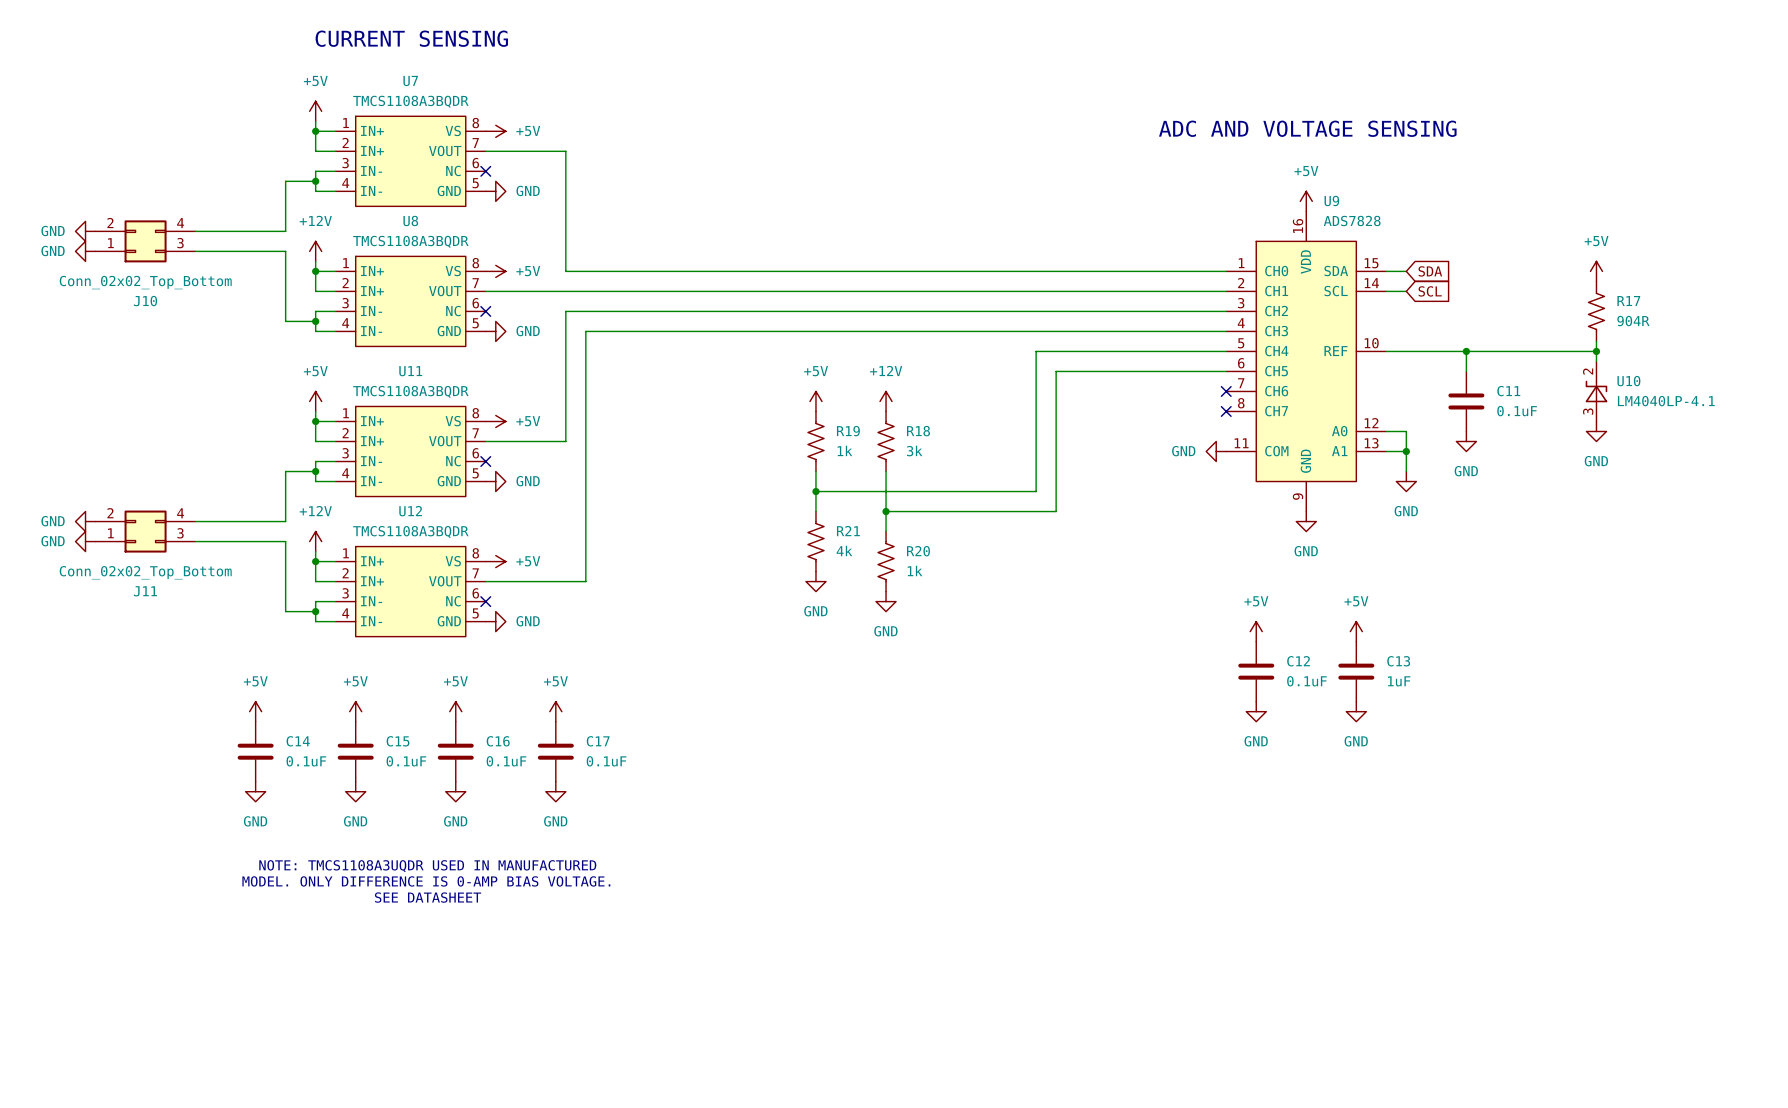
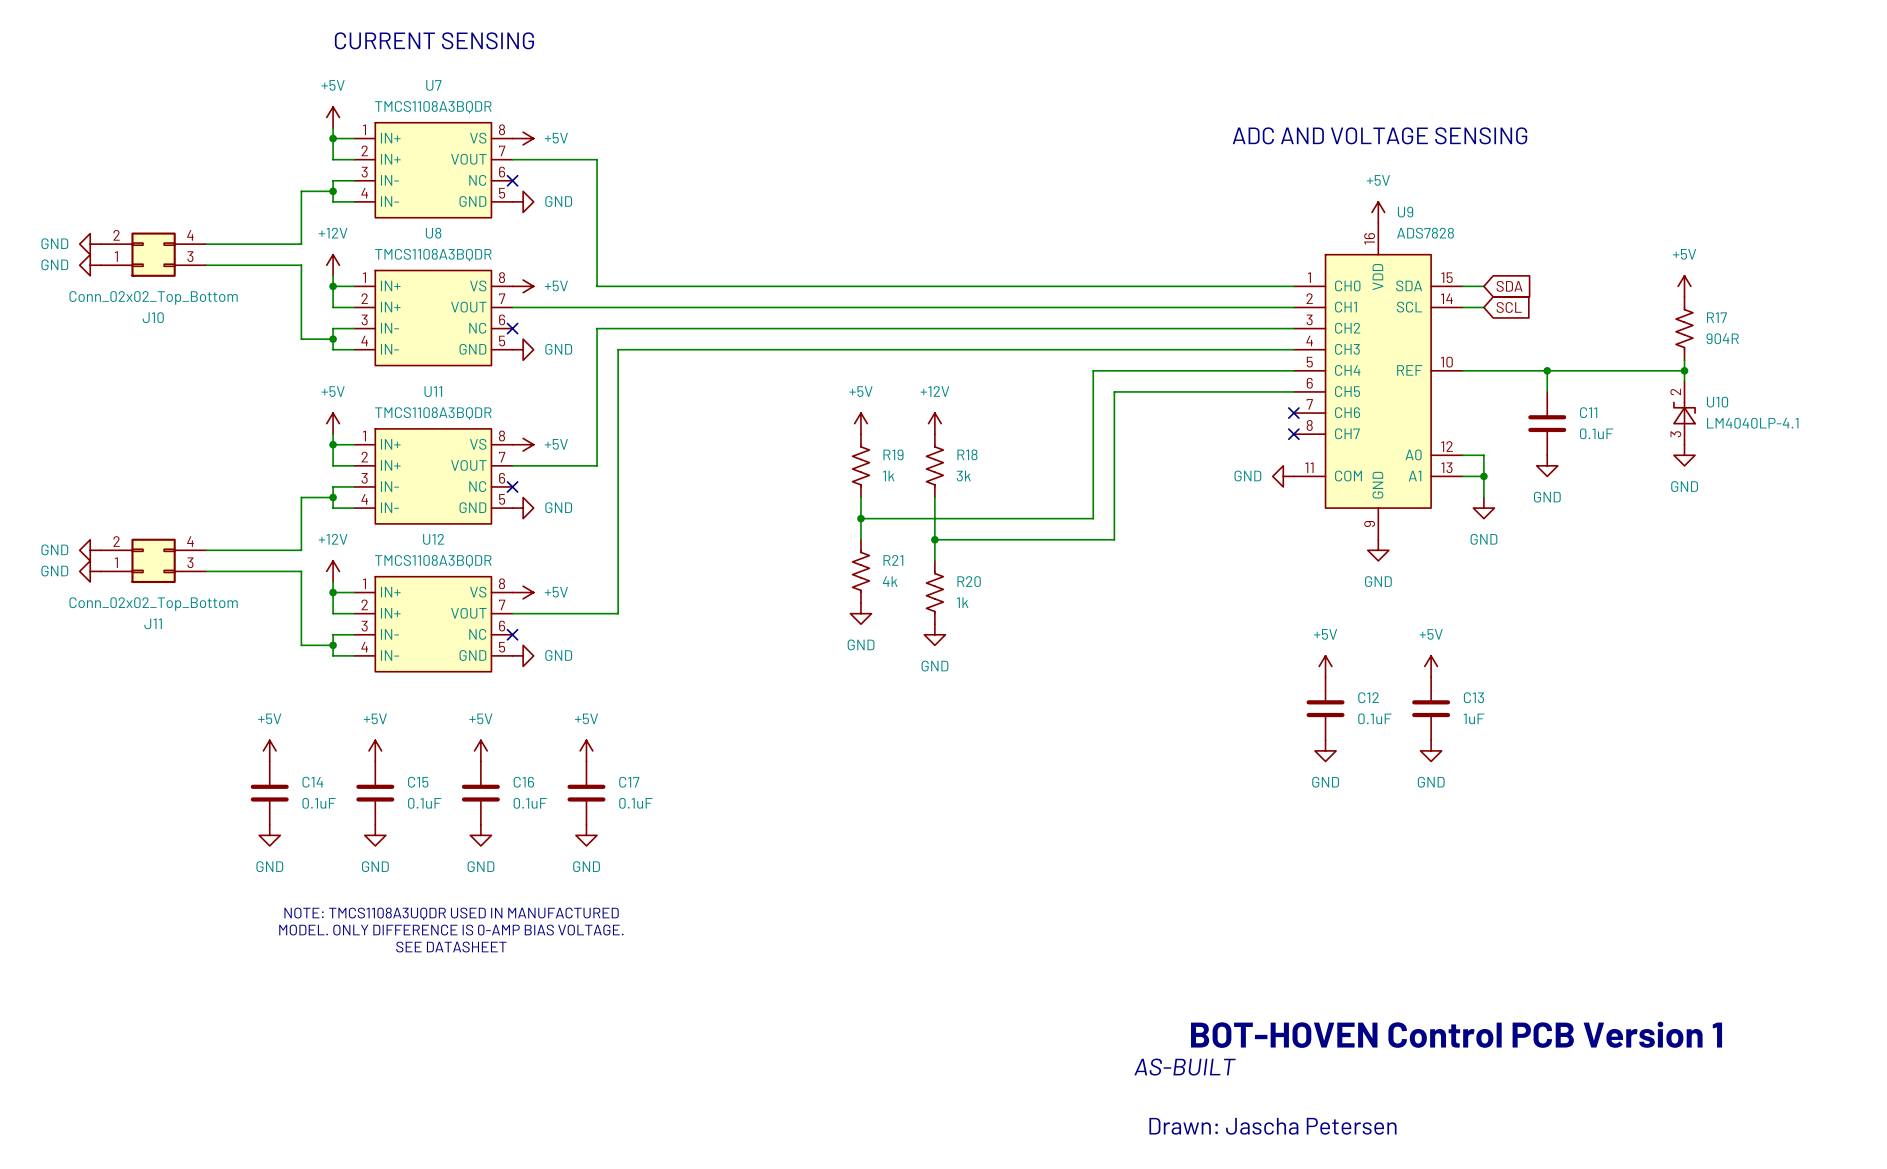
text: none -> BOT-HOVEN Control PCB Version 1 (1456, 1034)
text: none -> AS-BUILT (1184, 1067)
text: none -> Drawn: Jascha Petersen (1272, 1126)

